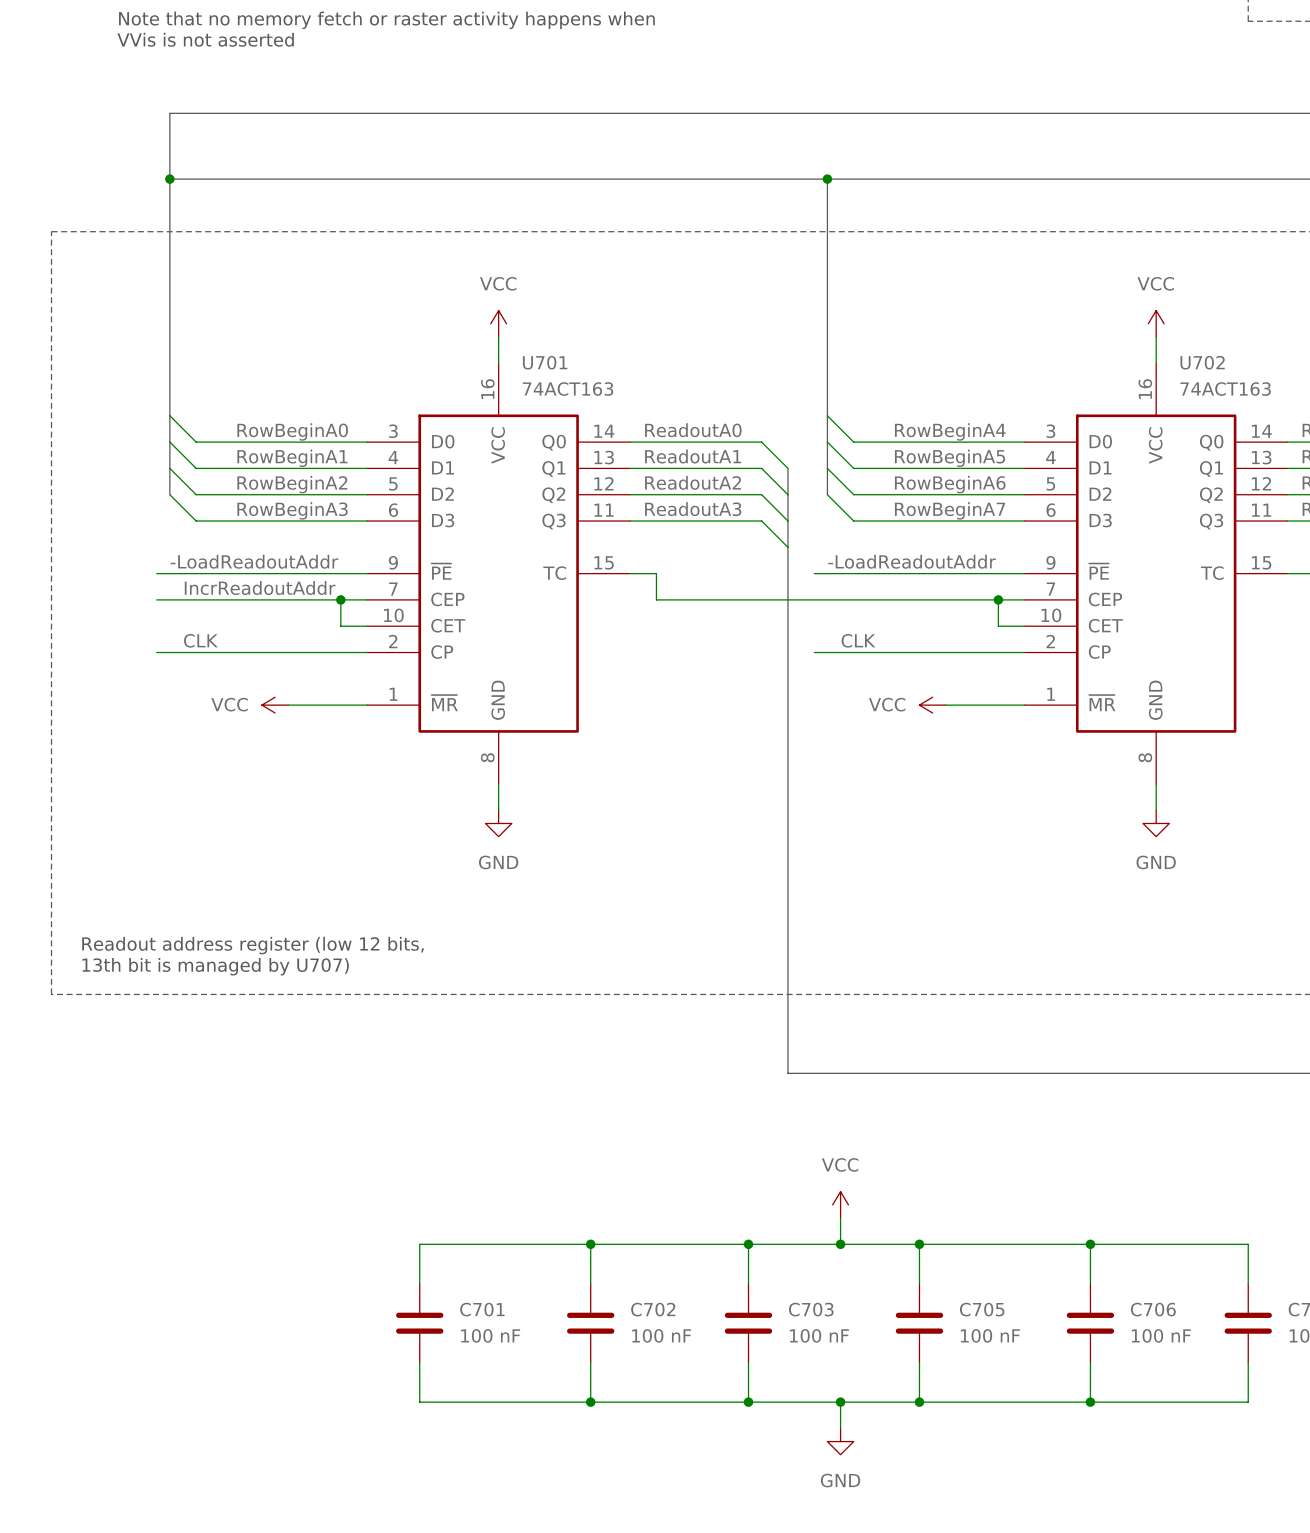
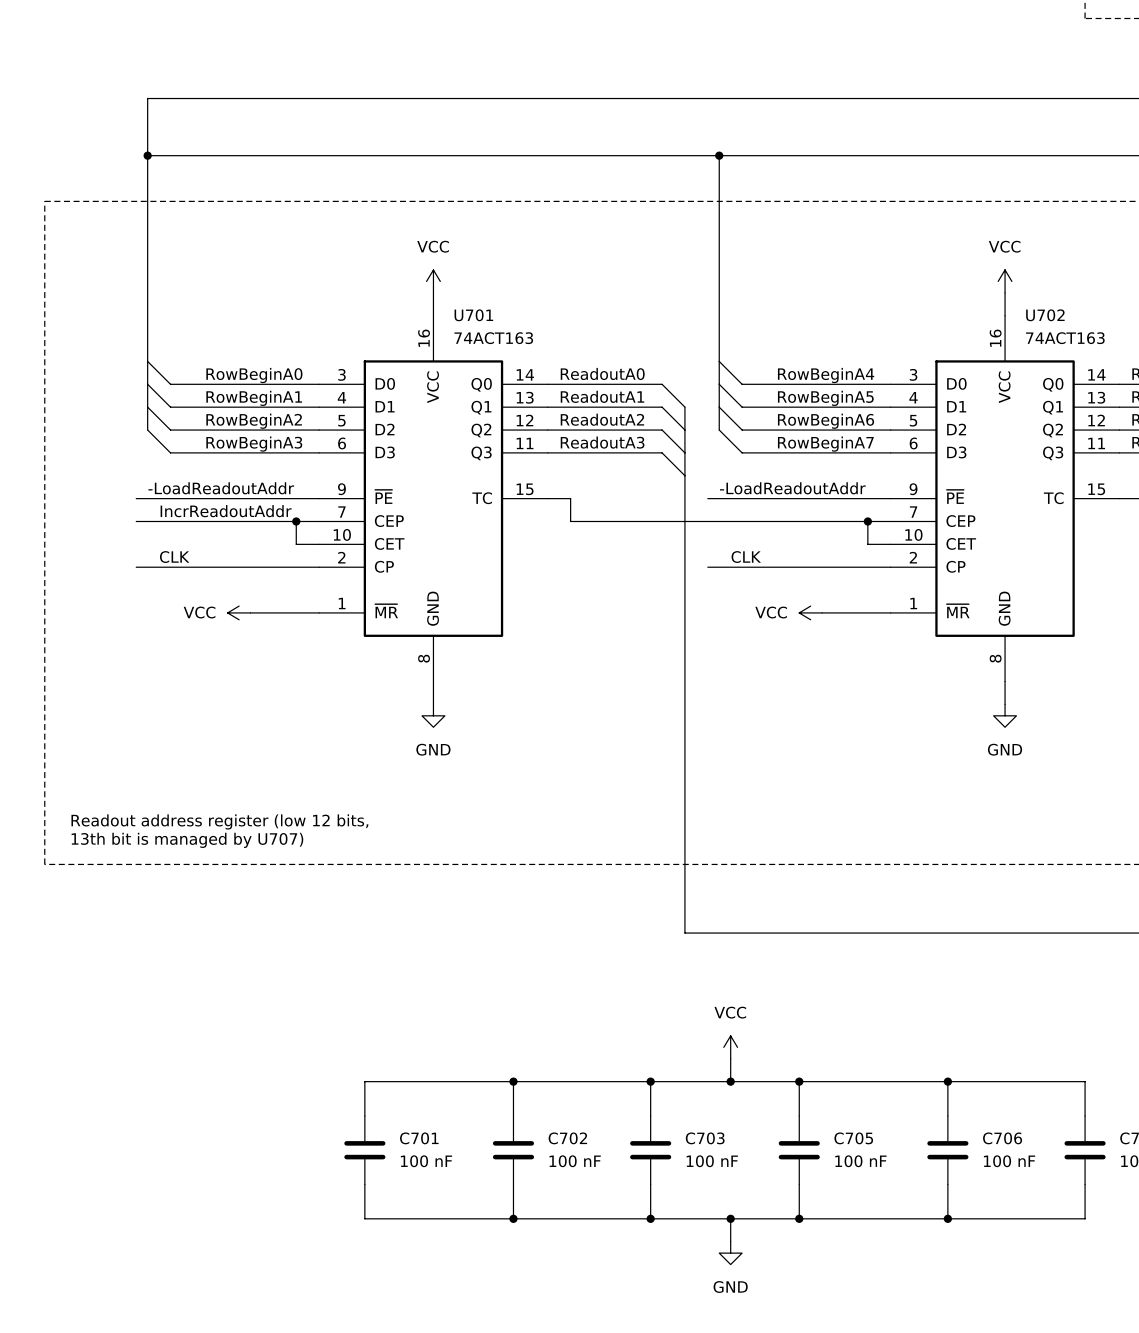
text: Note that no memory fetch or raster activity happens when (386, 20) -> none
text: VVis is not asserted (205, 39) -> none

